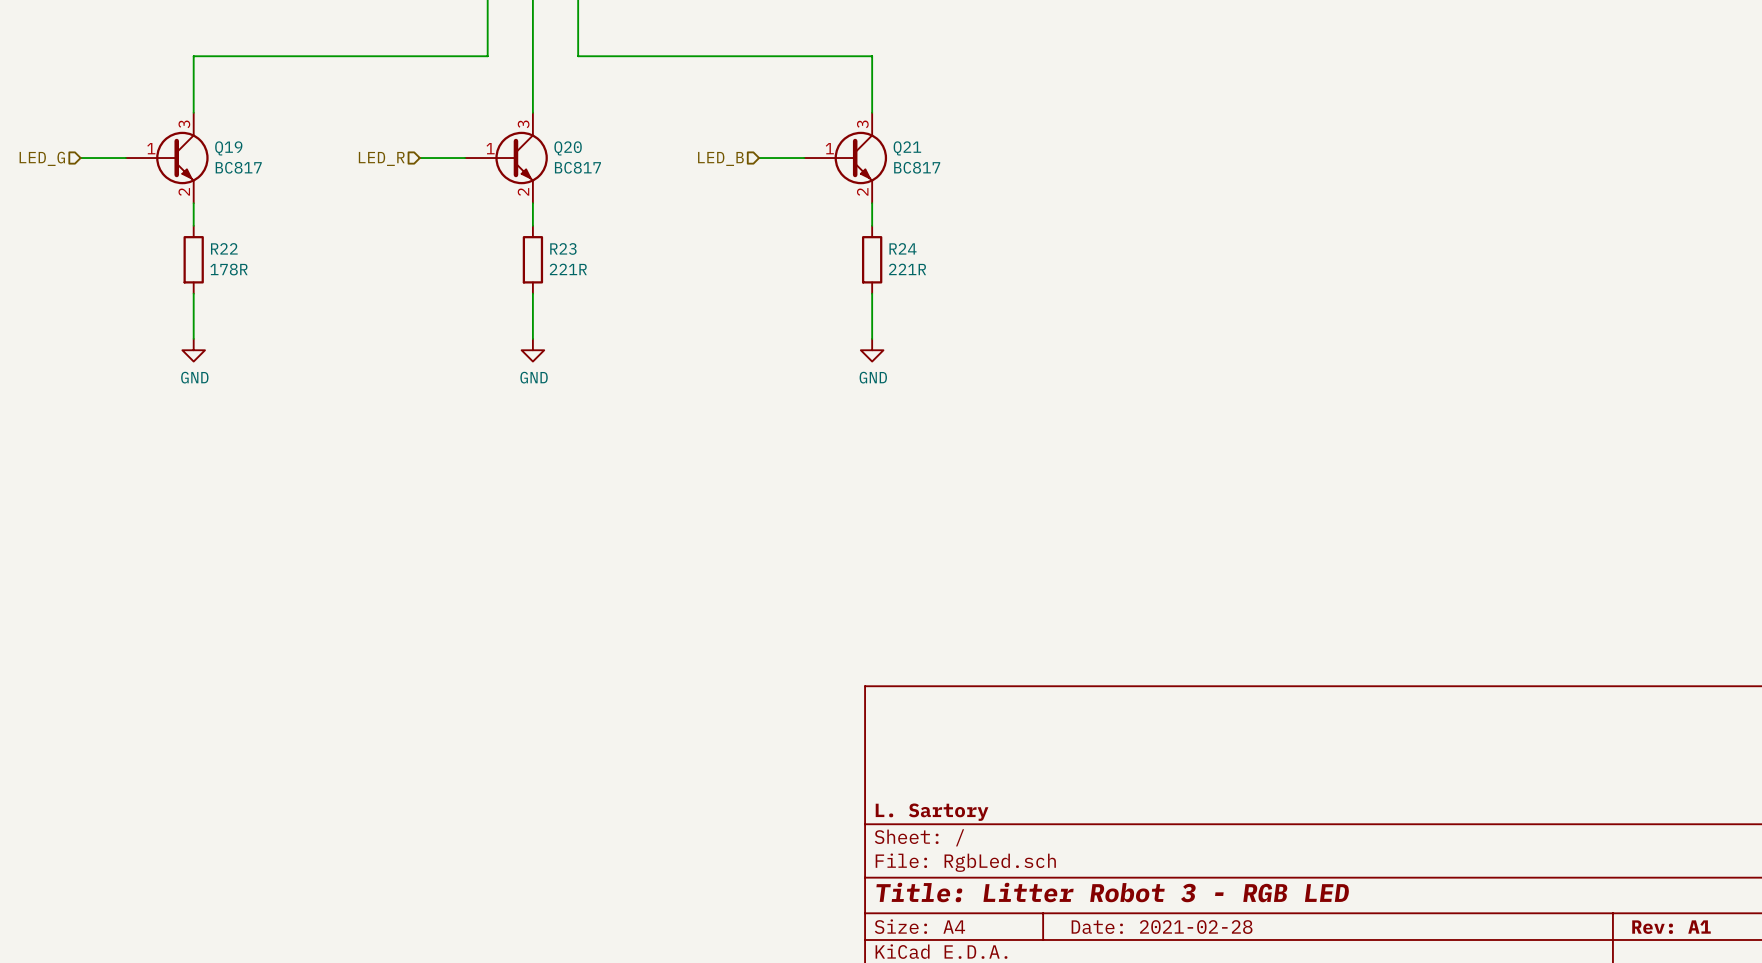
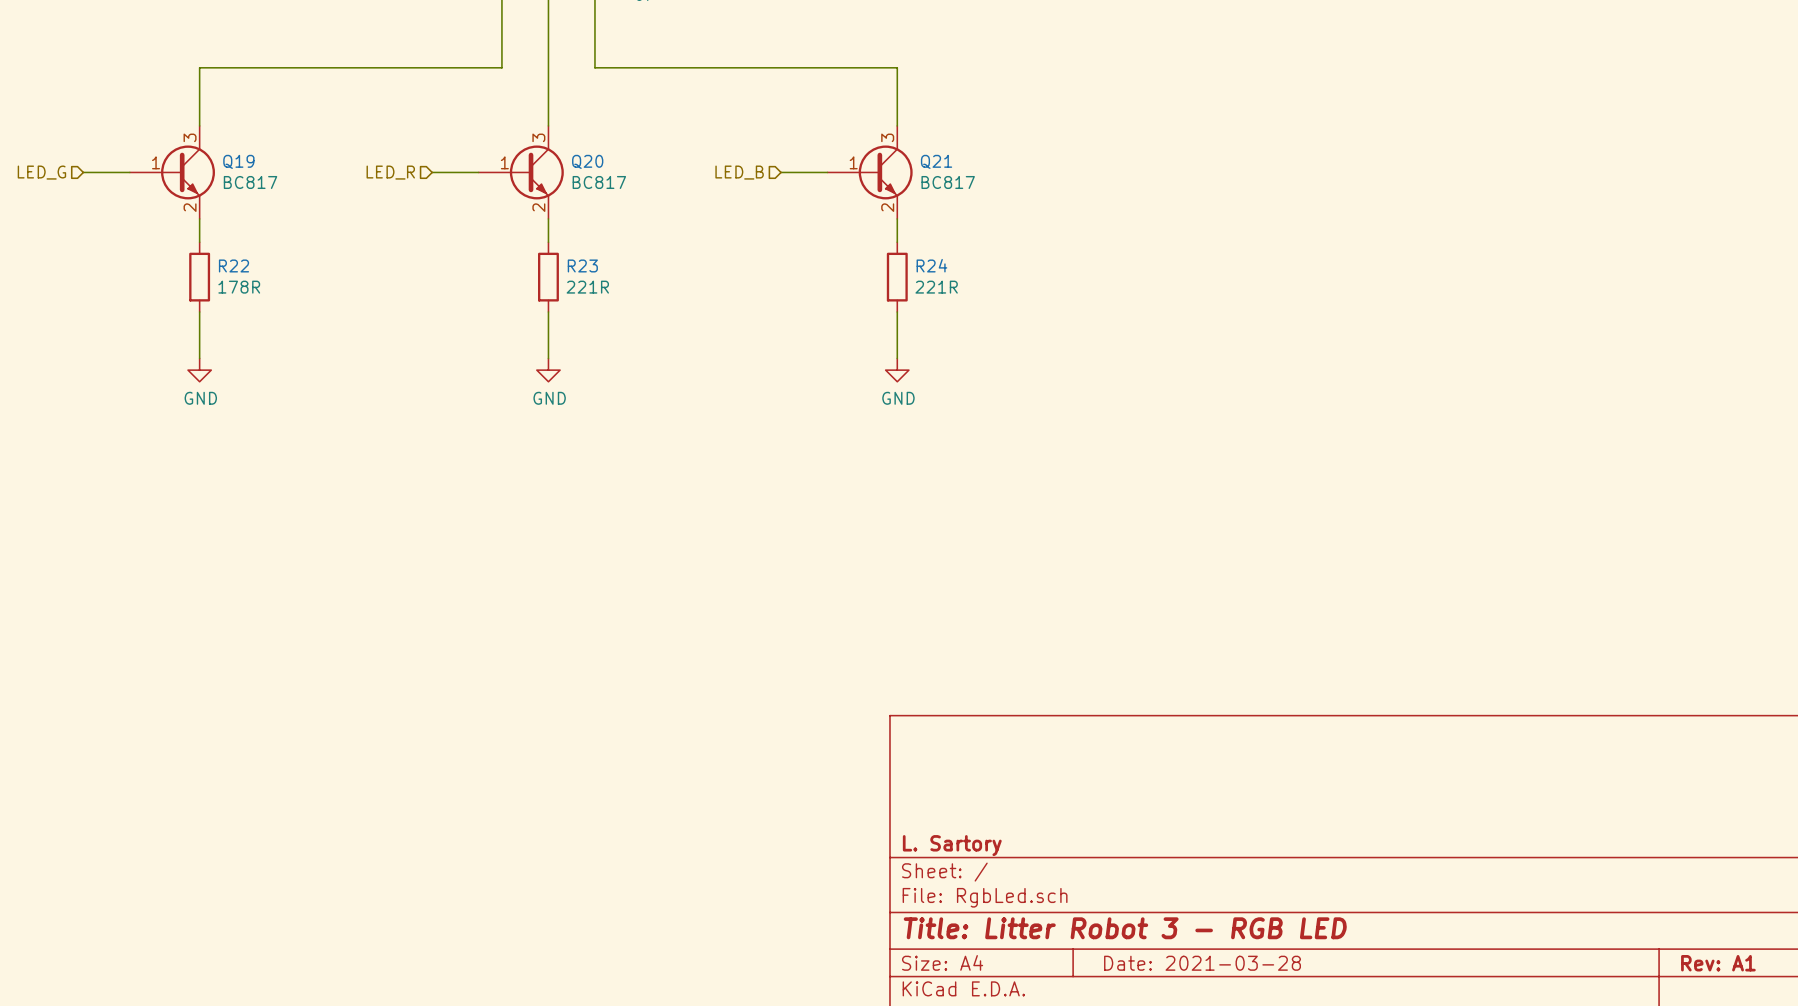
title block: Date: 2021-02-28 (1162, 927) -> Date: 2021-03-28 (1202, 963)

